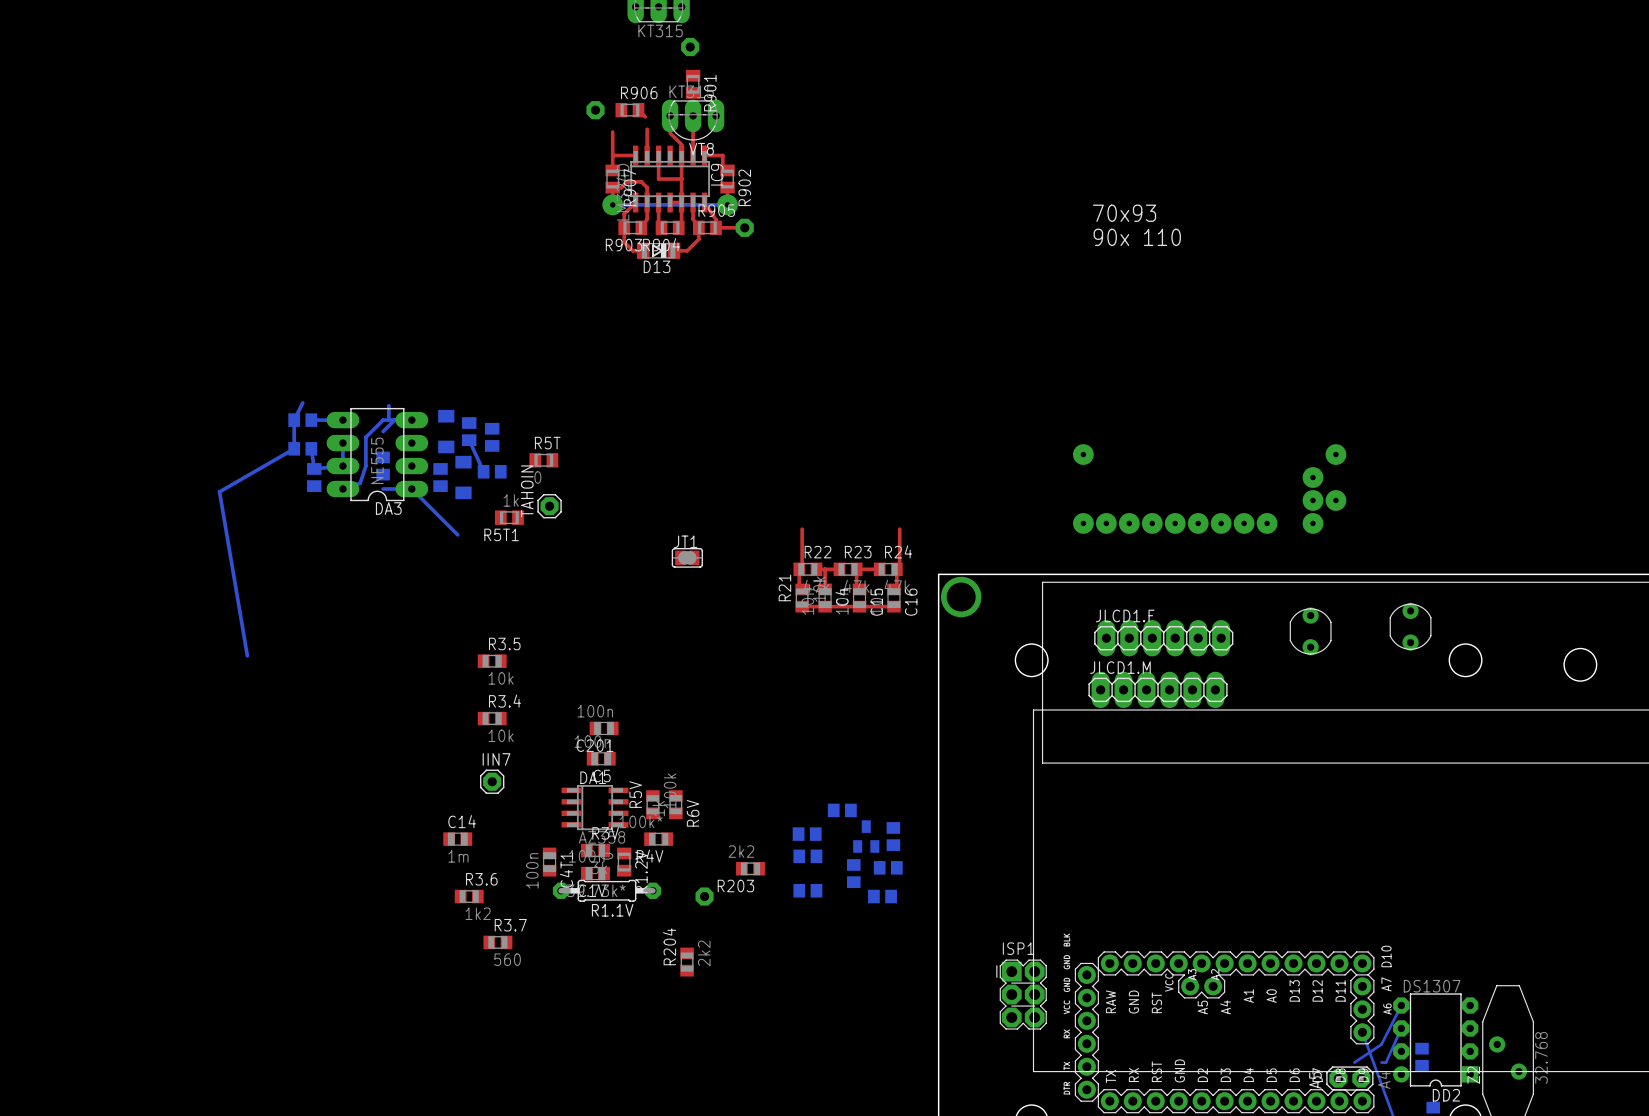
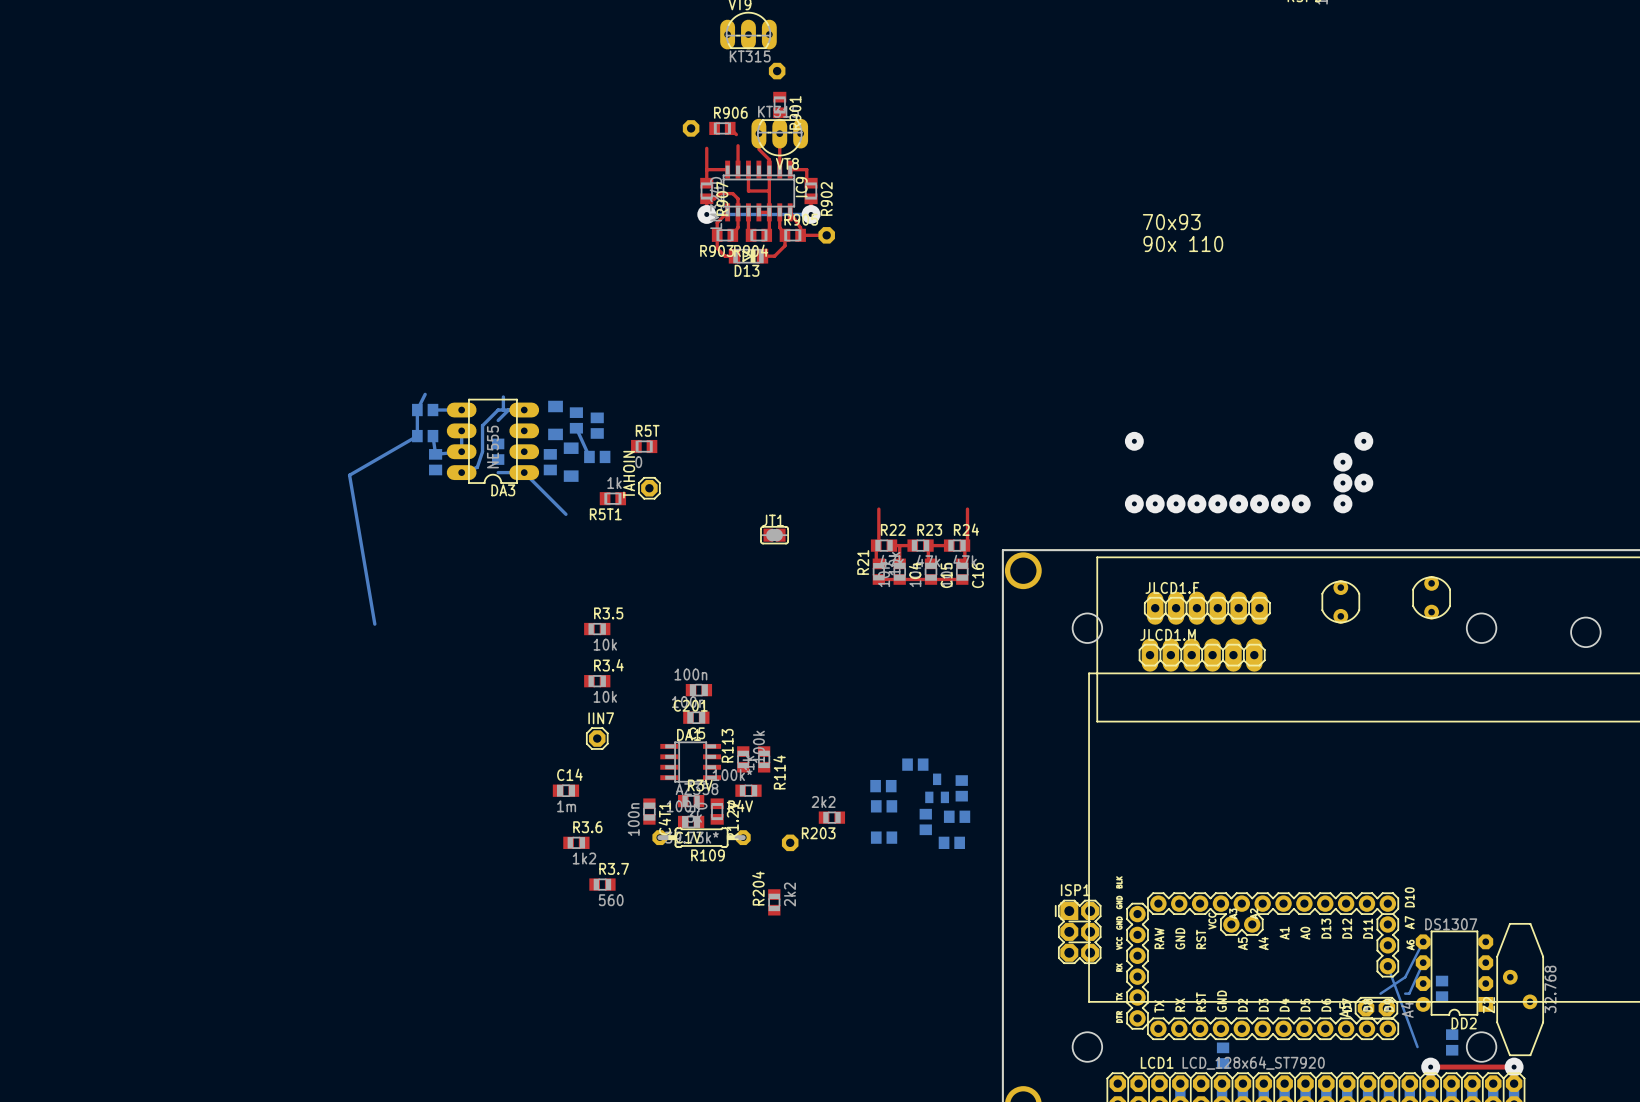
R5V name: R5V (635, 794) -> R113 (727, 745)
R6V name: R6V (693, 813) -> R114 (779, 772)
R1.1V name: R1.1V (612, 910) -> R109 (708, 855)

